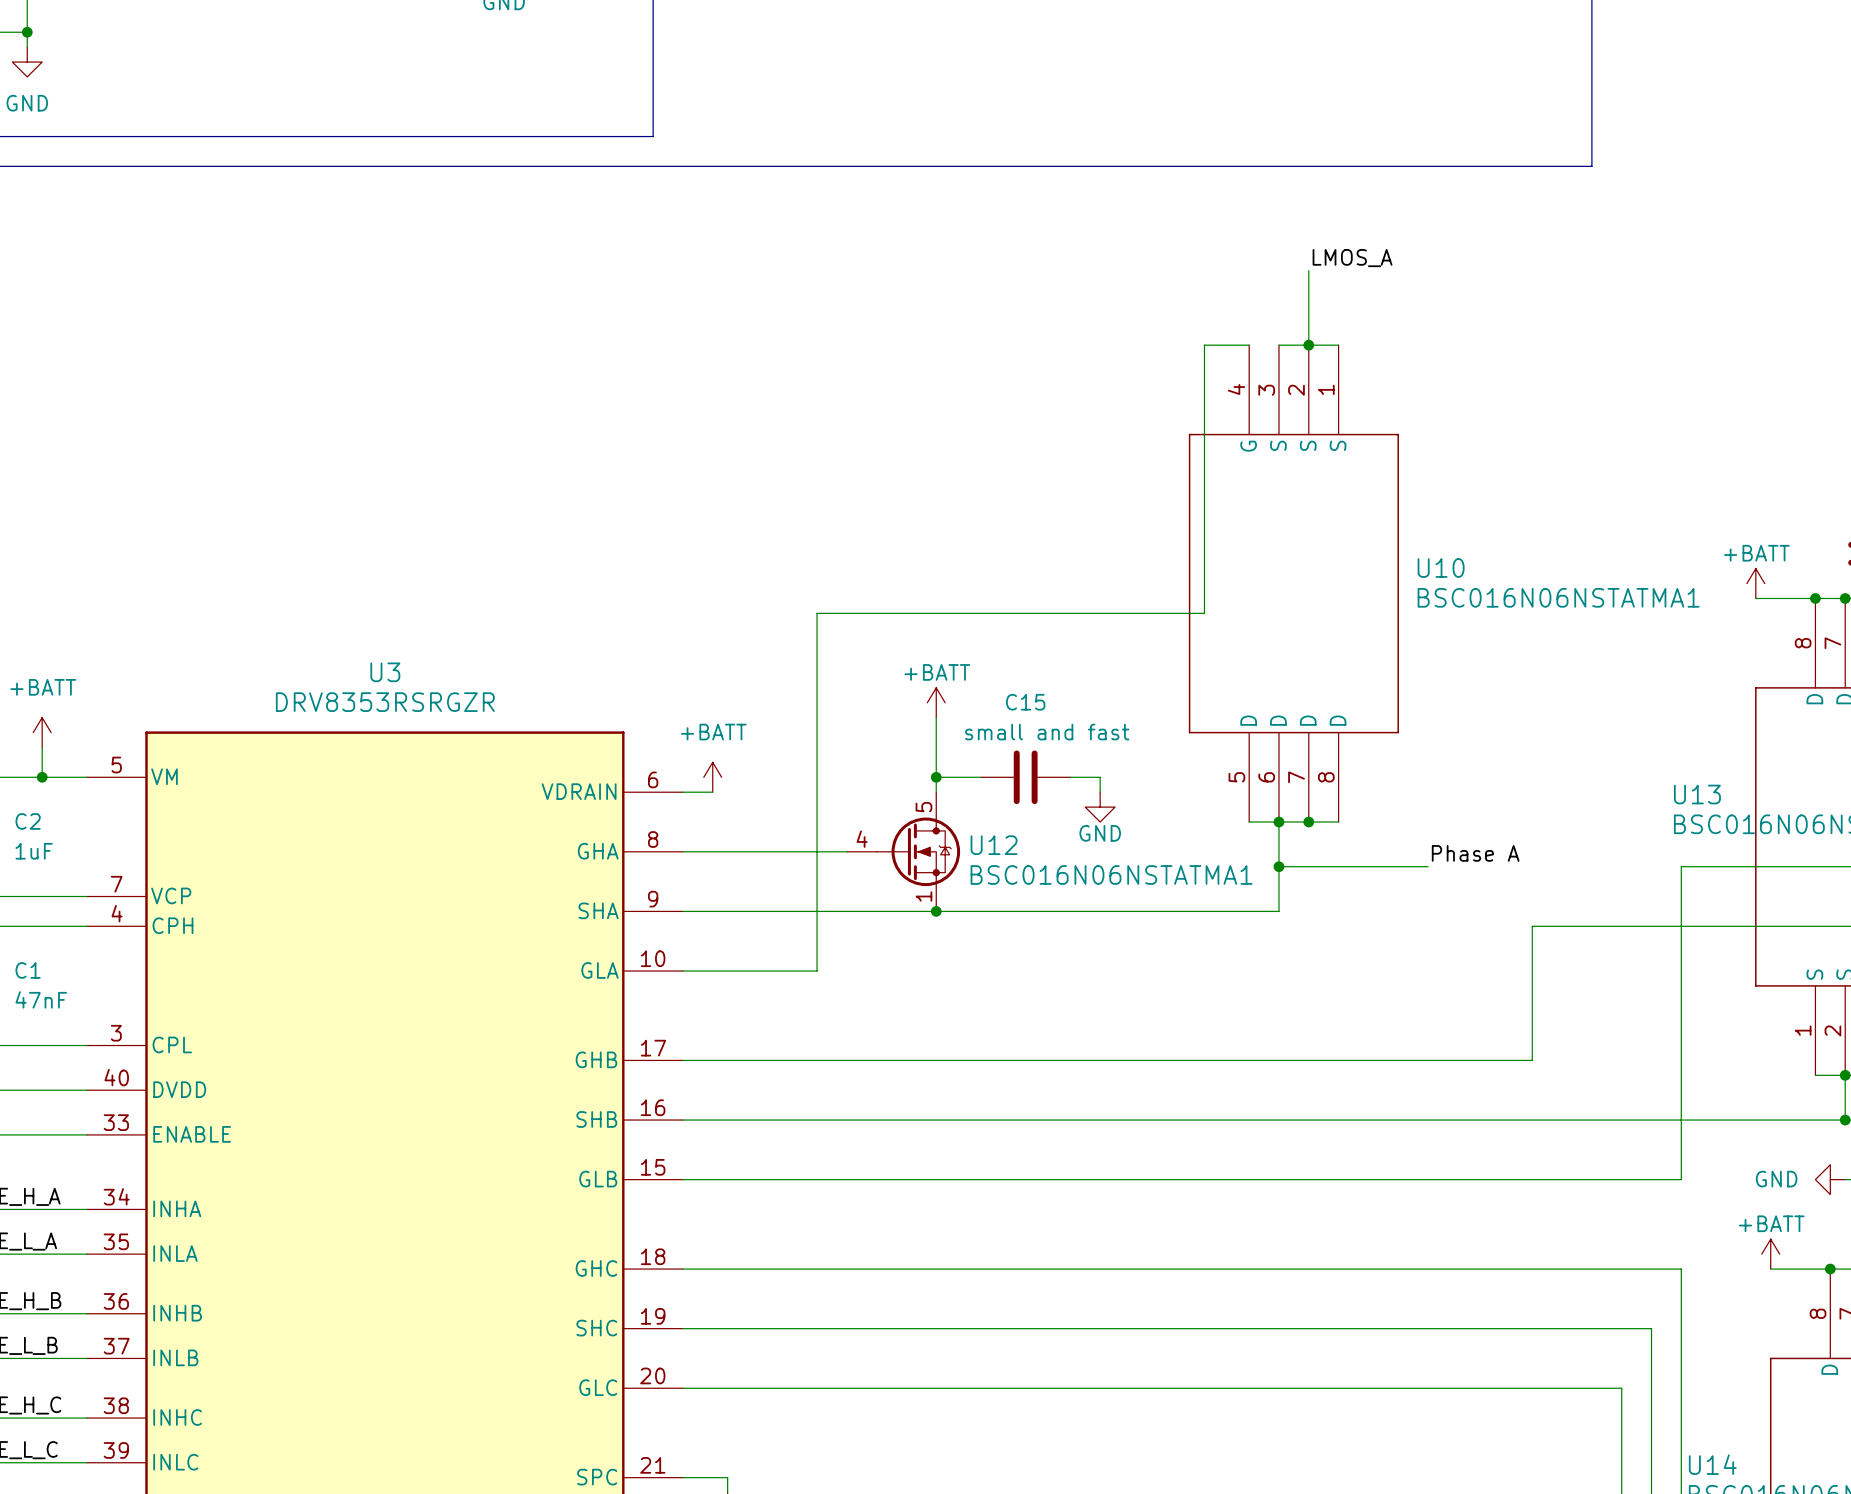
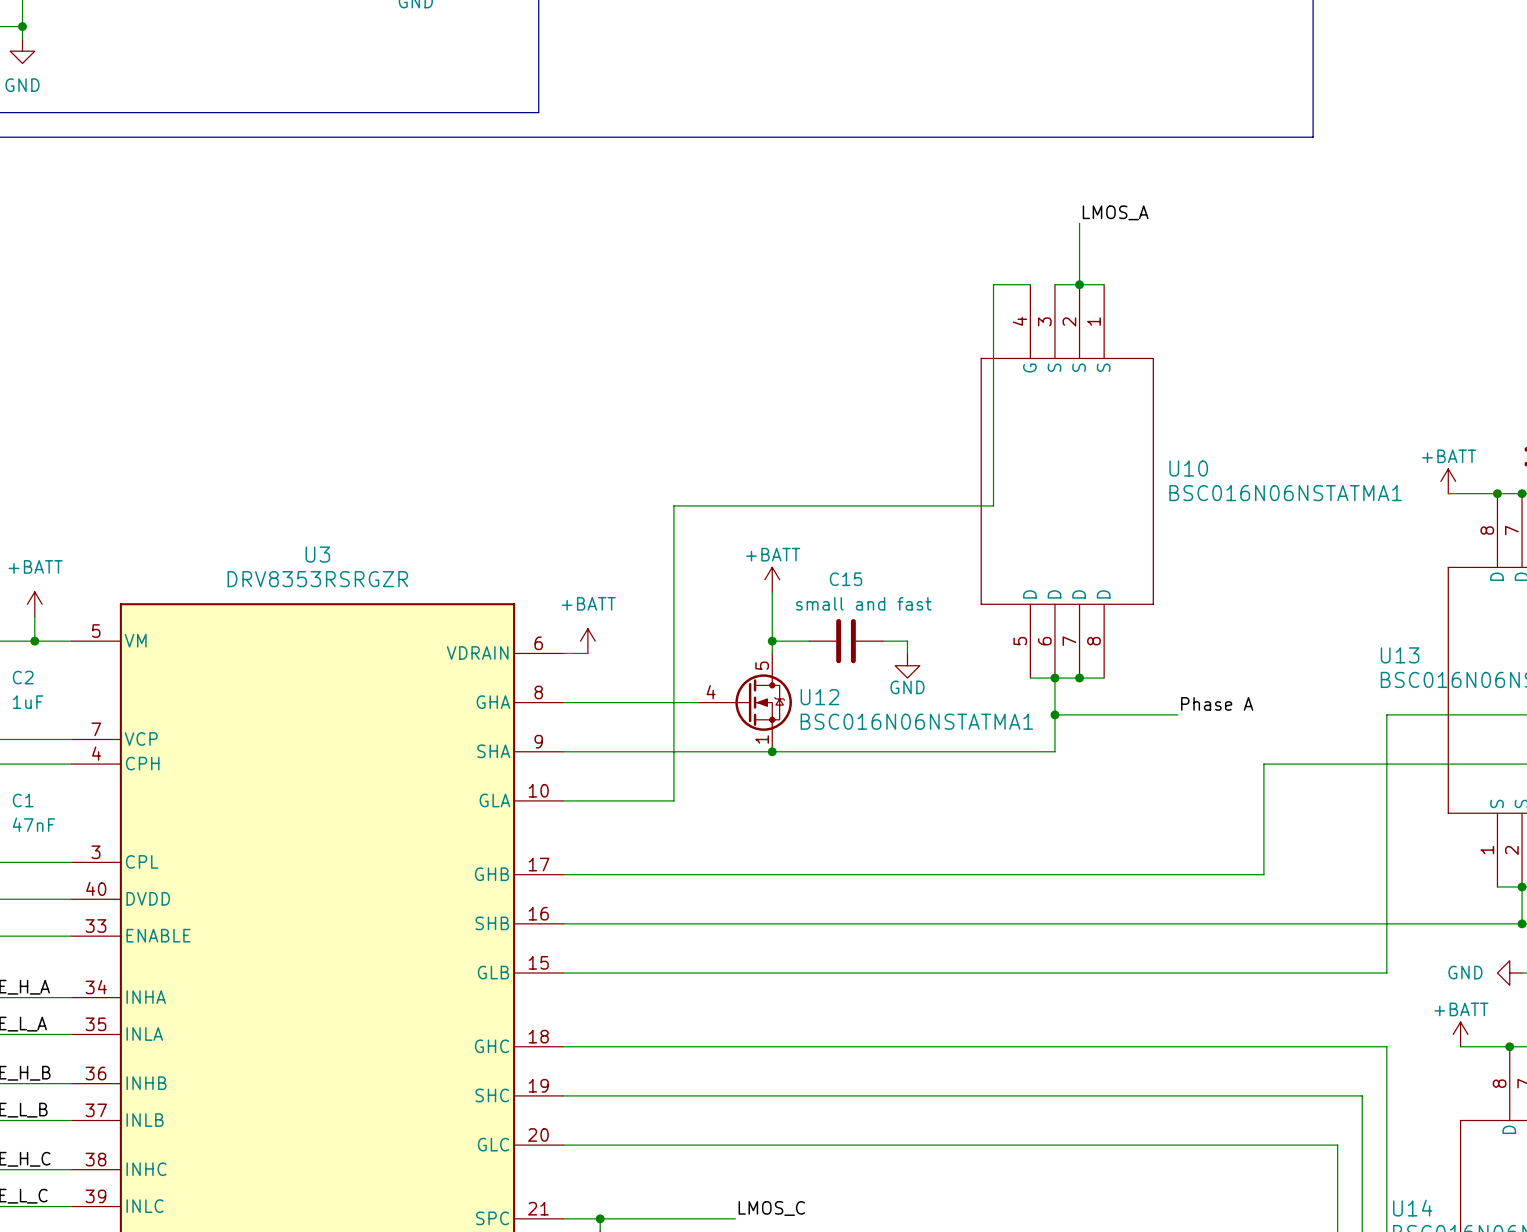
label: none -> LMOS_C (771, 1208)
wire: none -> (600, 1218) (735, 1218)
junction: none -> (600, 1218)

